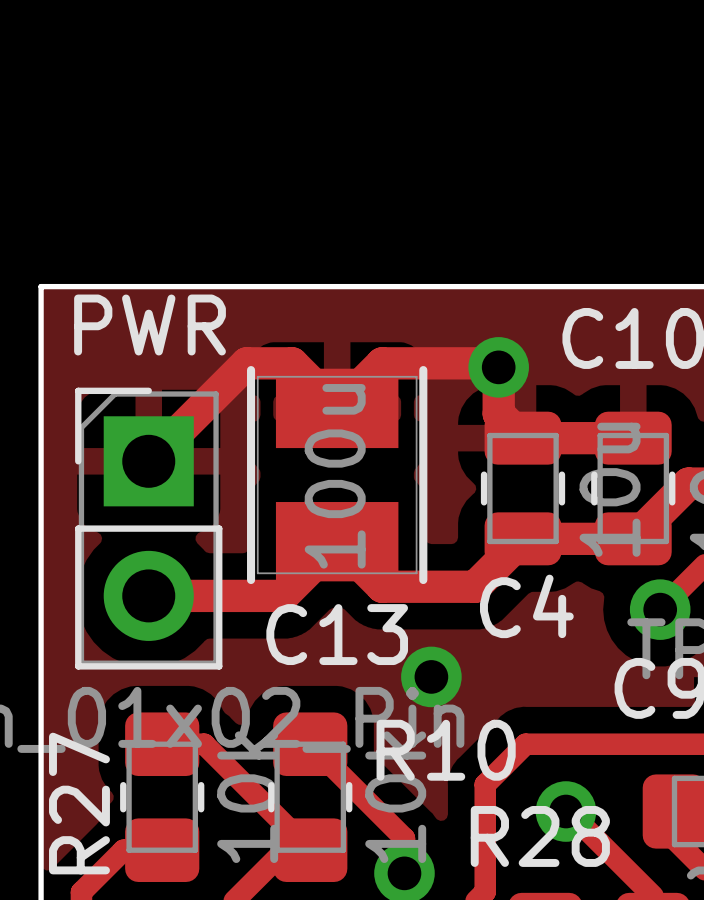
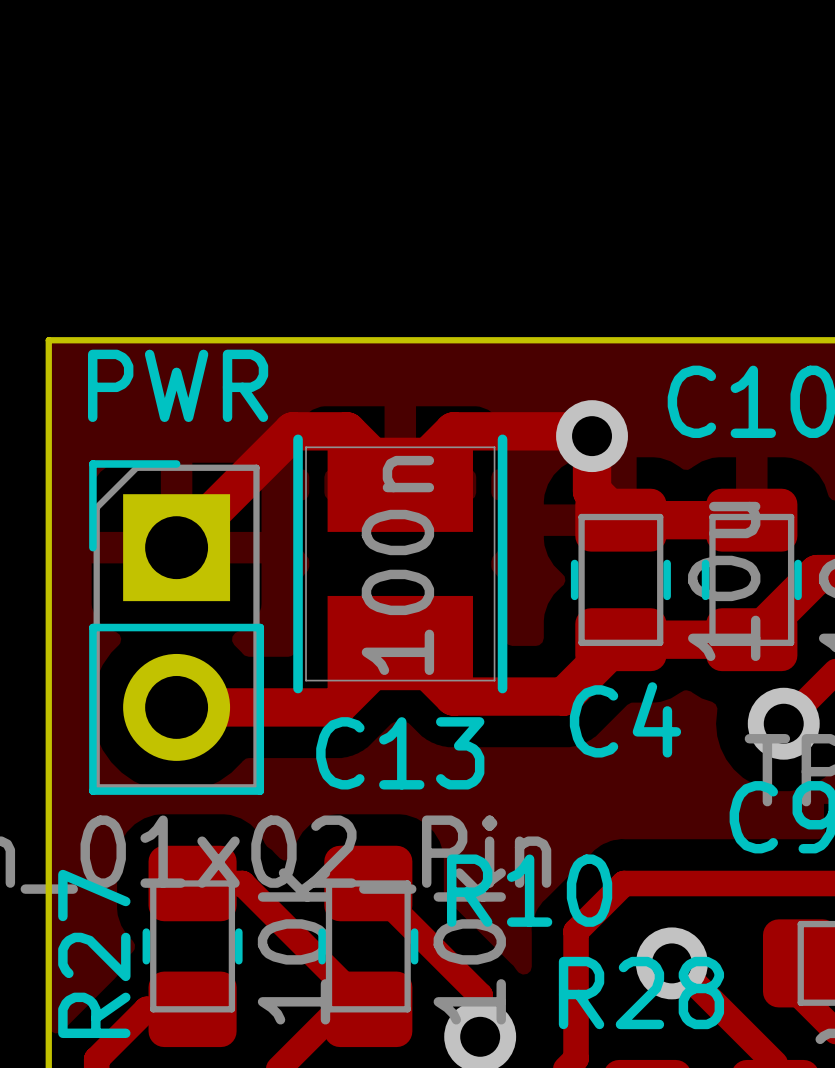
C13 value: 100u (335, 476) -> 100n (397, 565)
via: (431, 676) -> none

